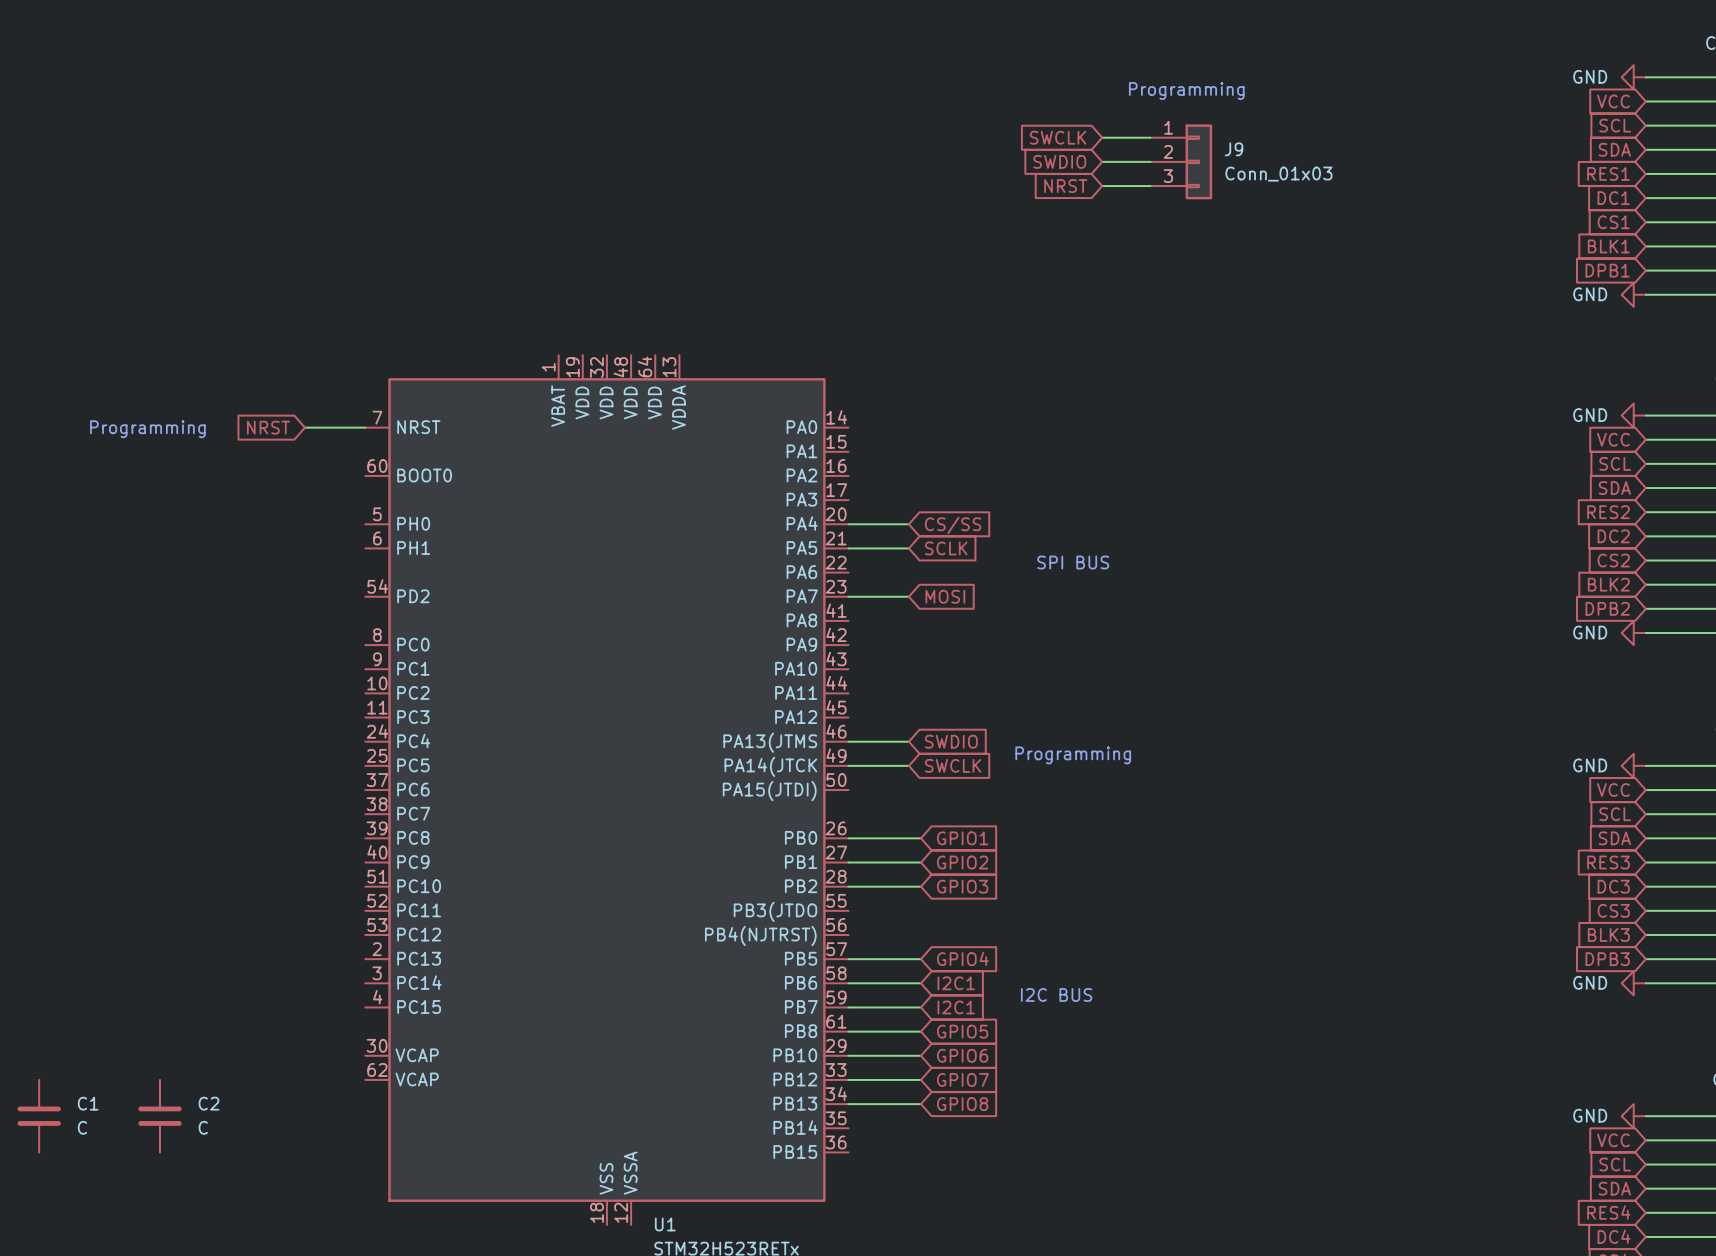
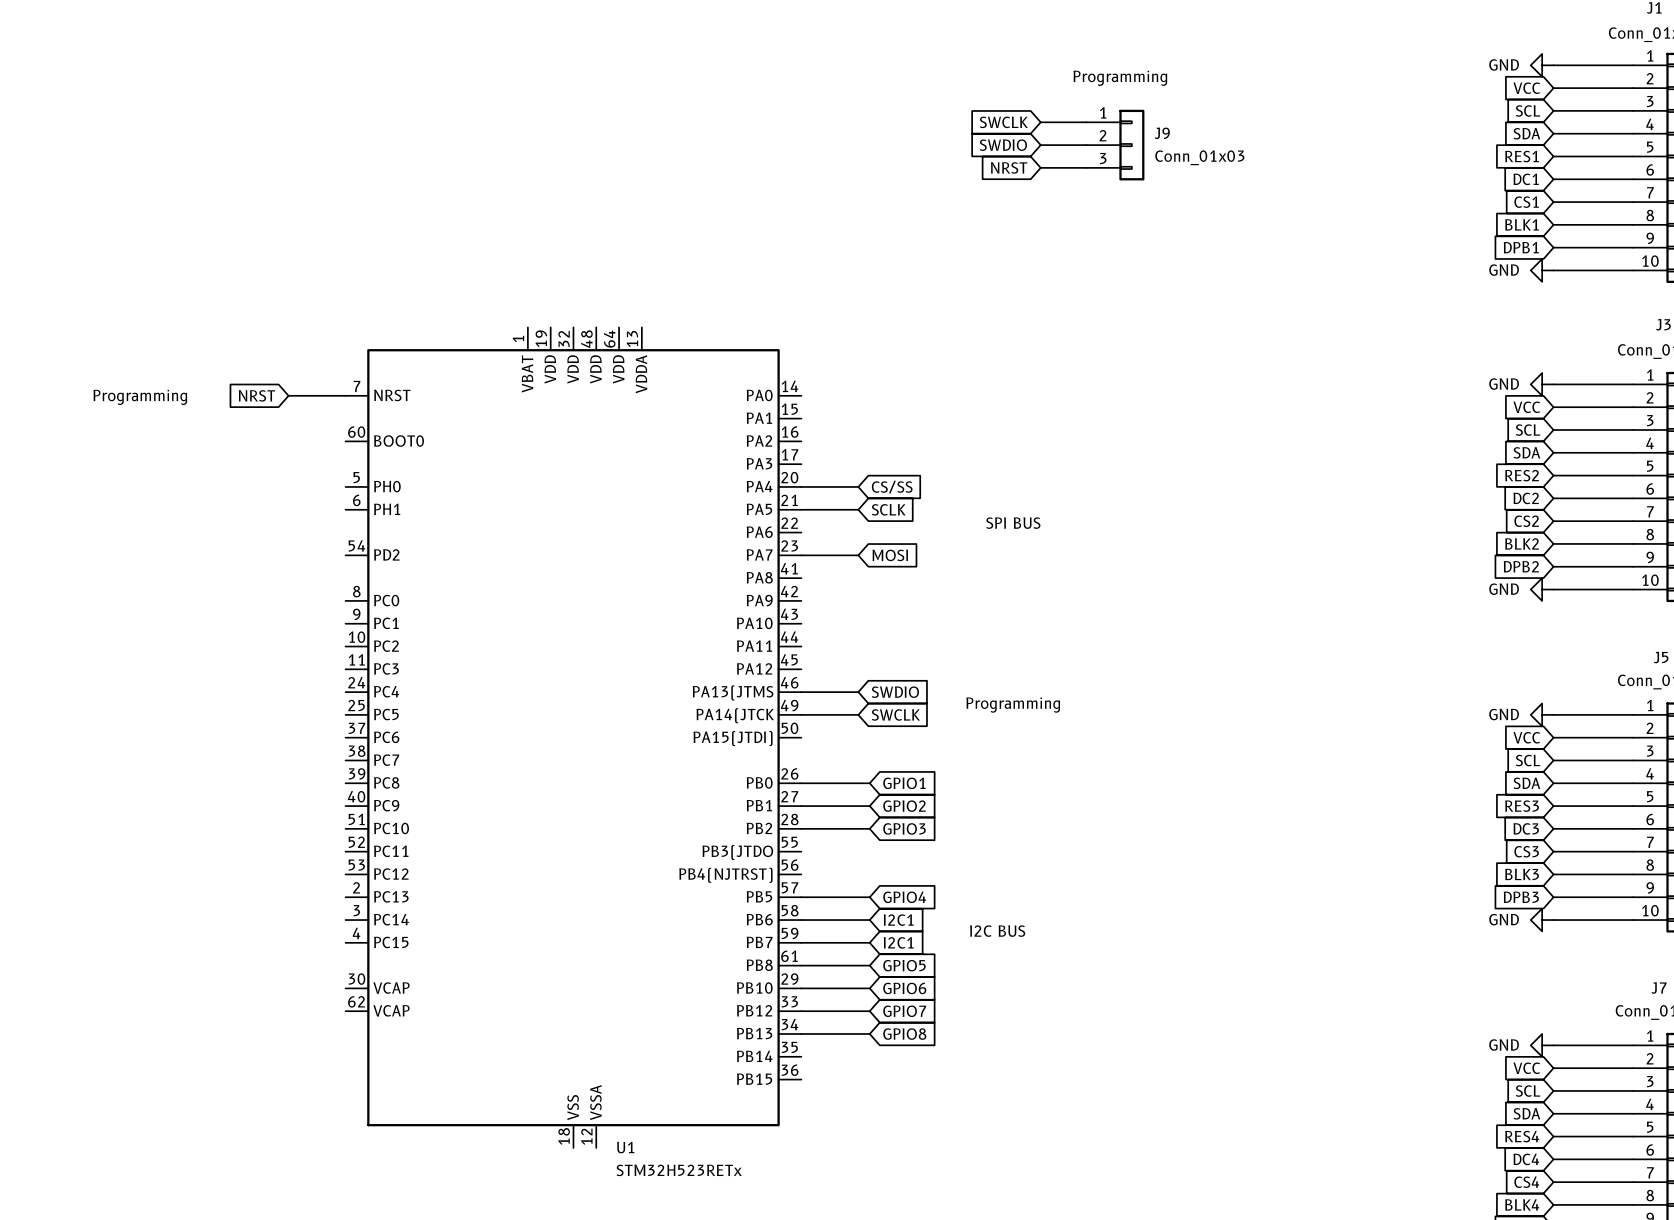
C1: C (39, 1116) -> none
C2: C (159, 1116) -> none

